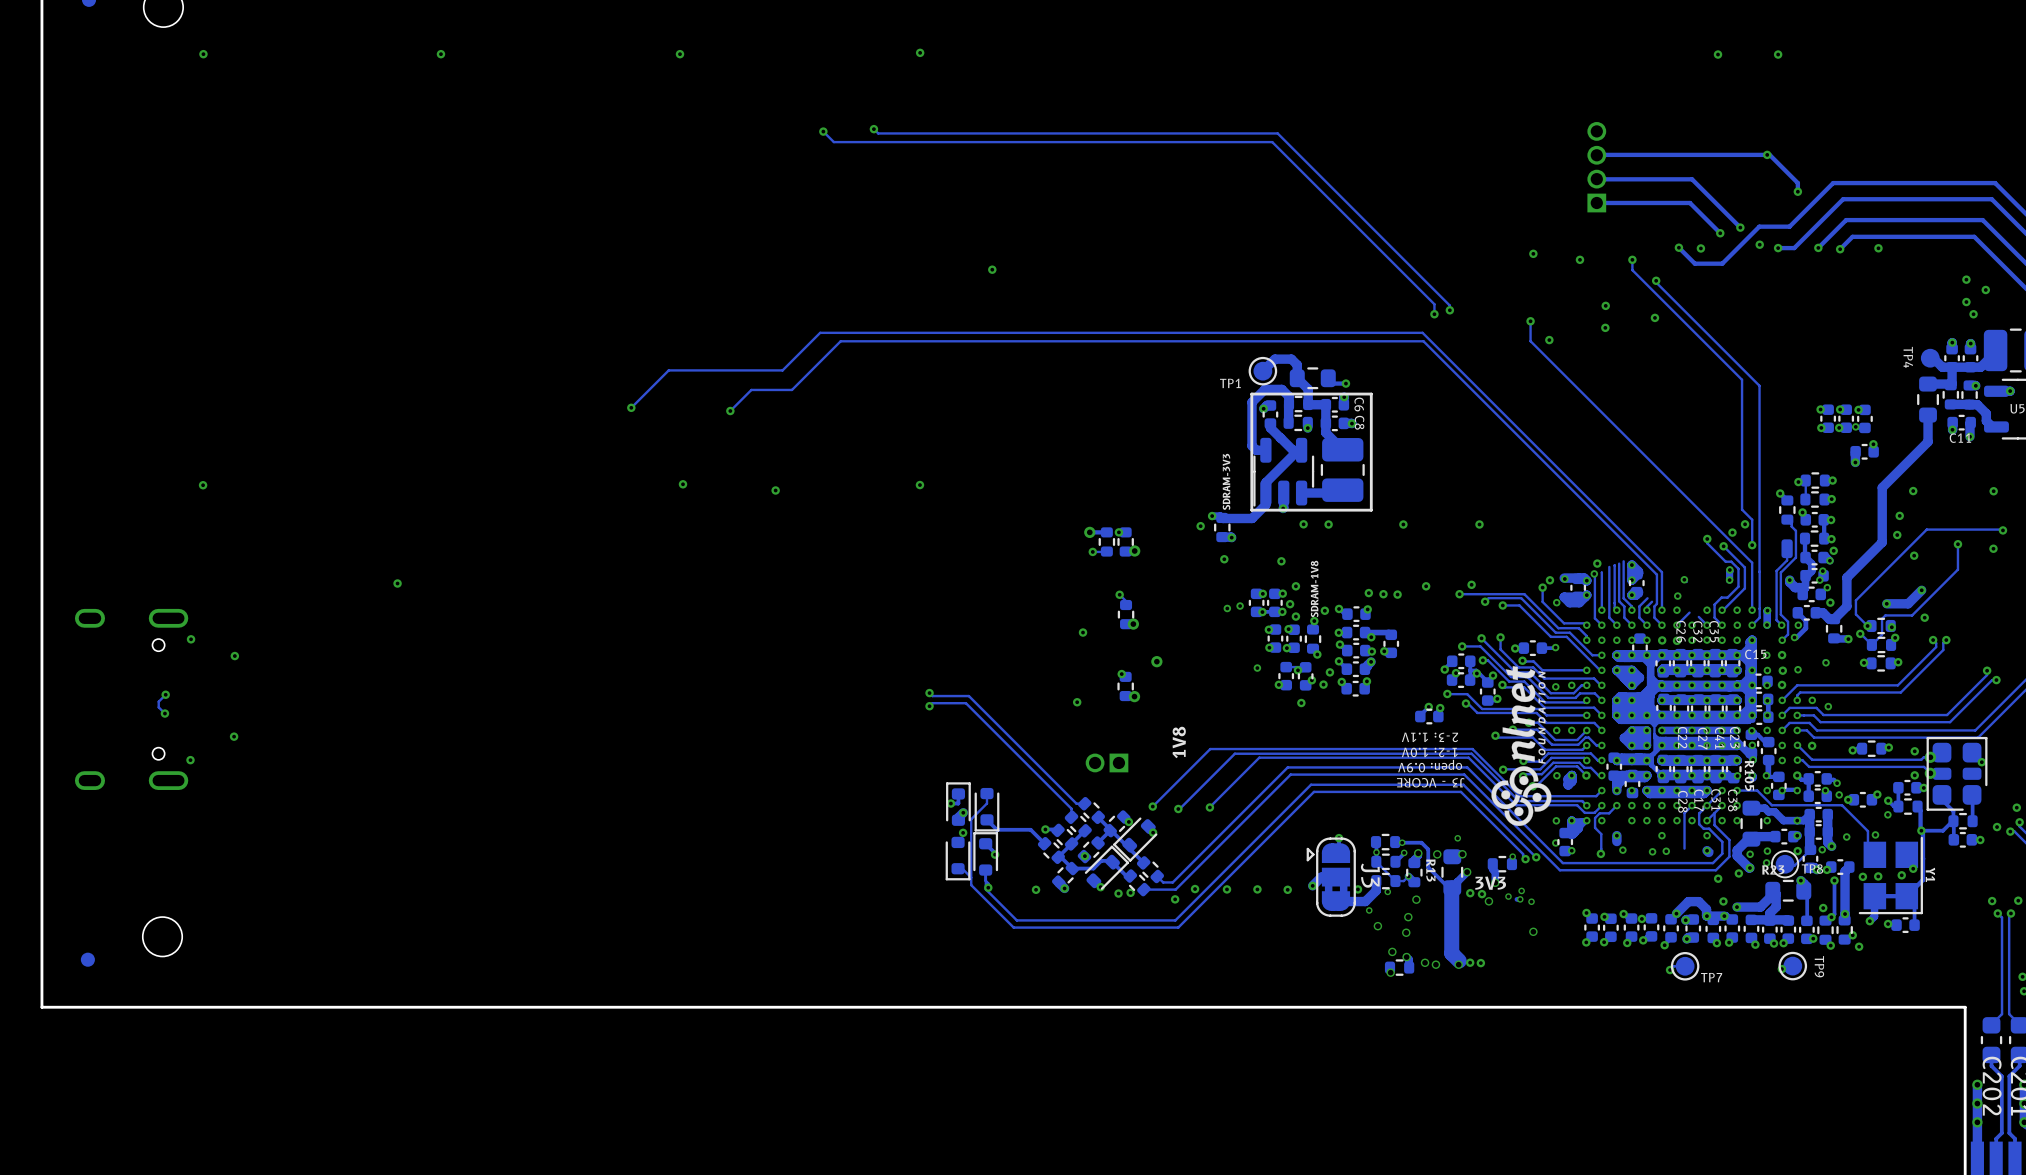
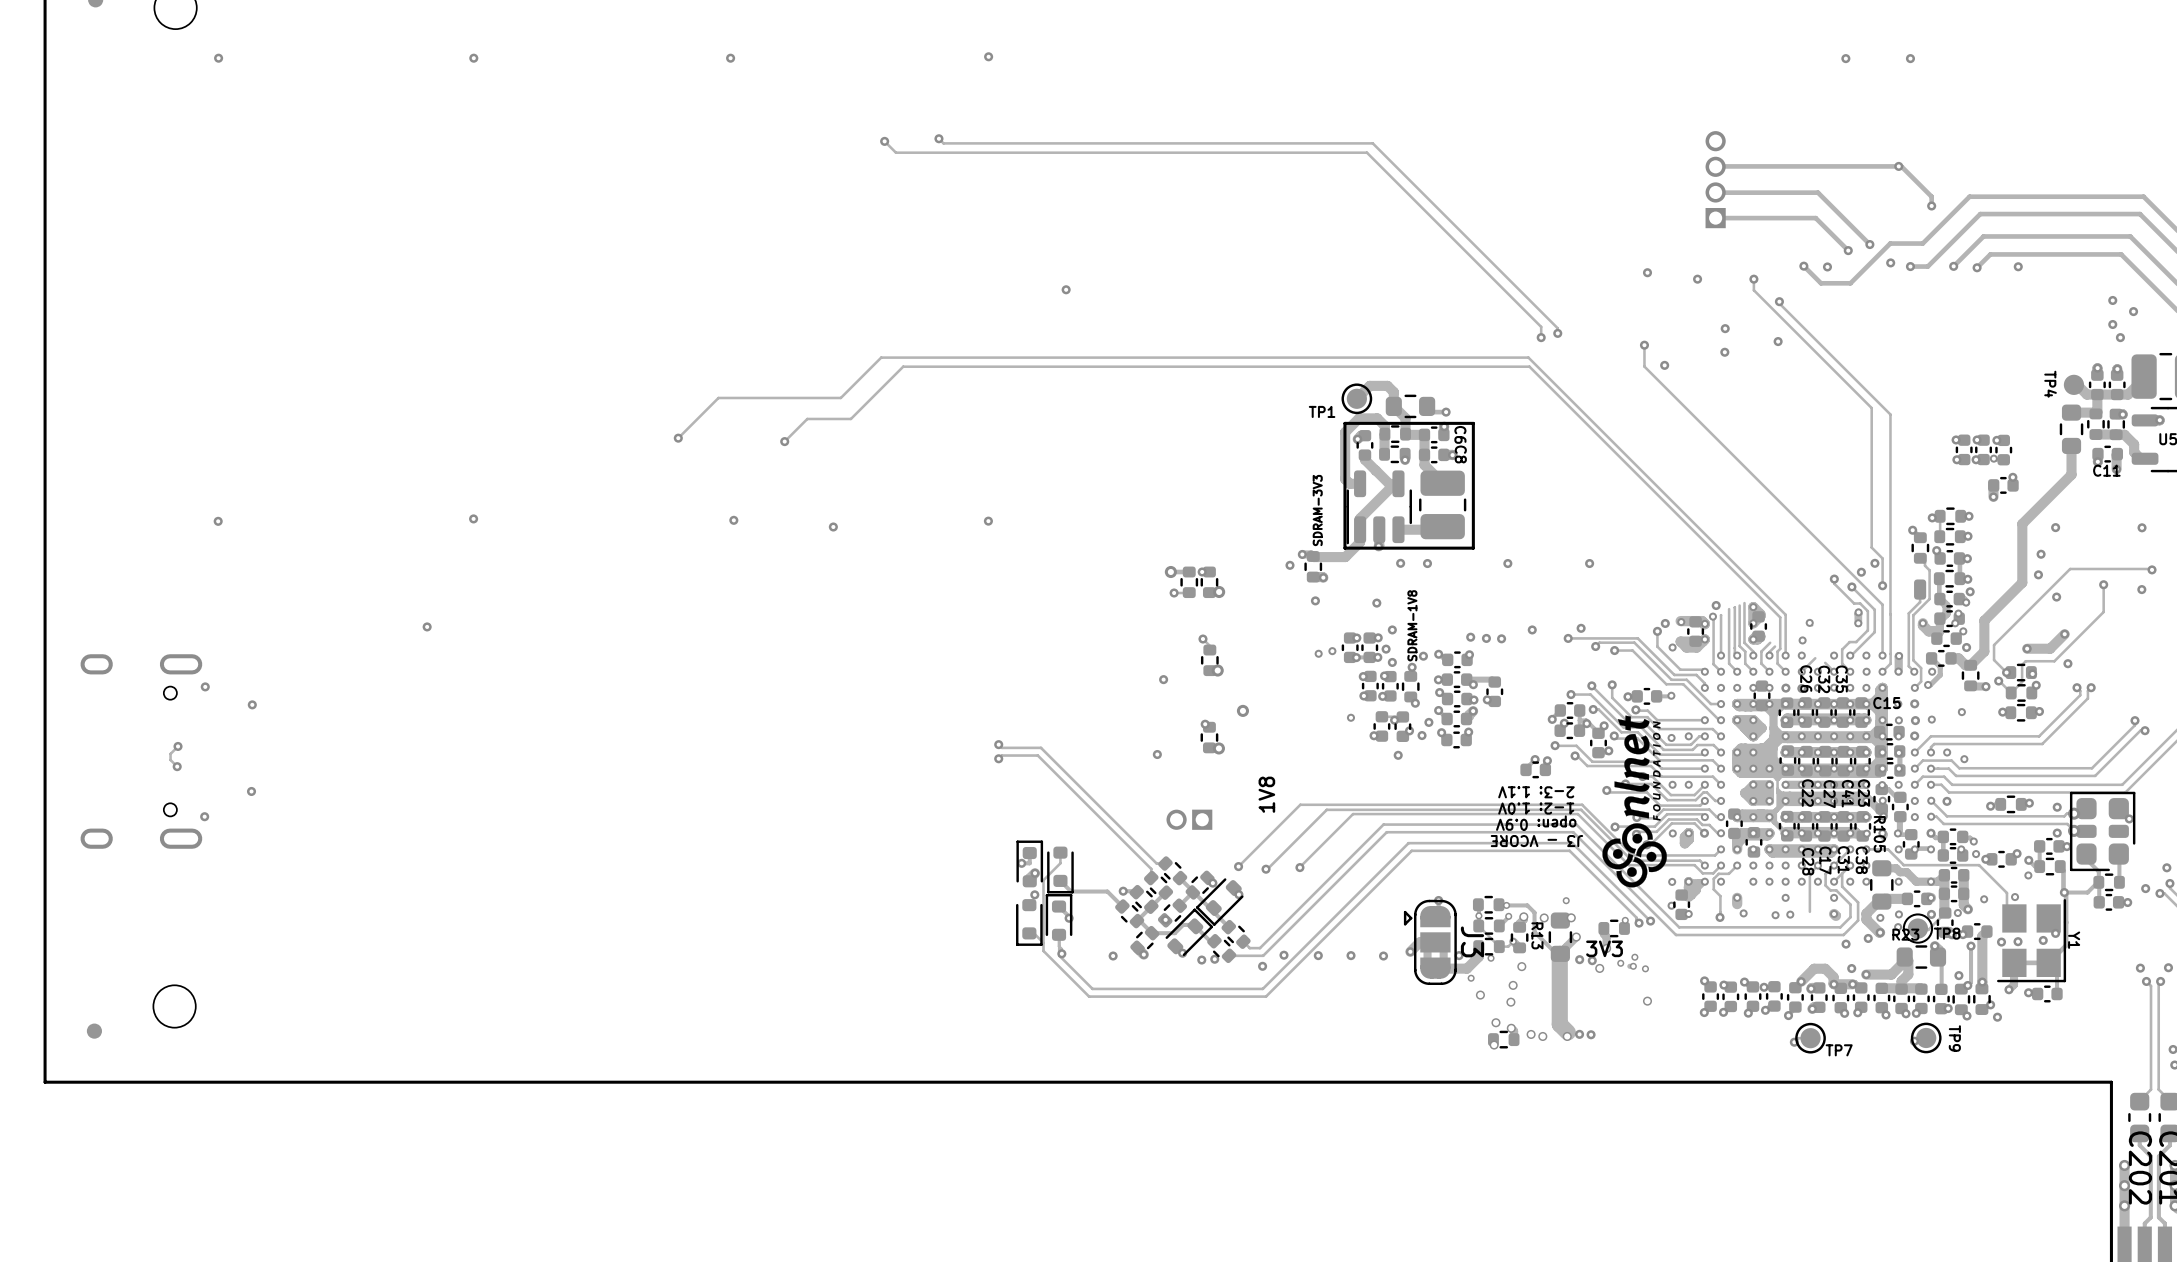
via: none -> (473, 518)

